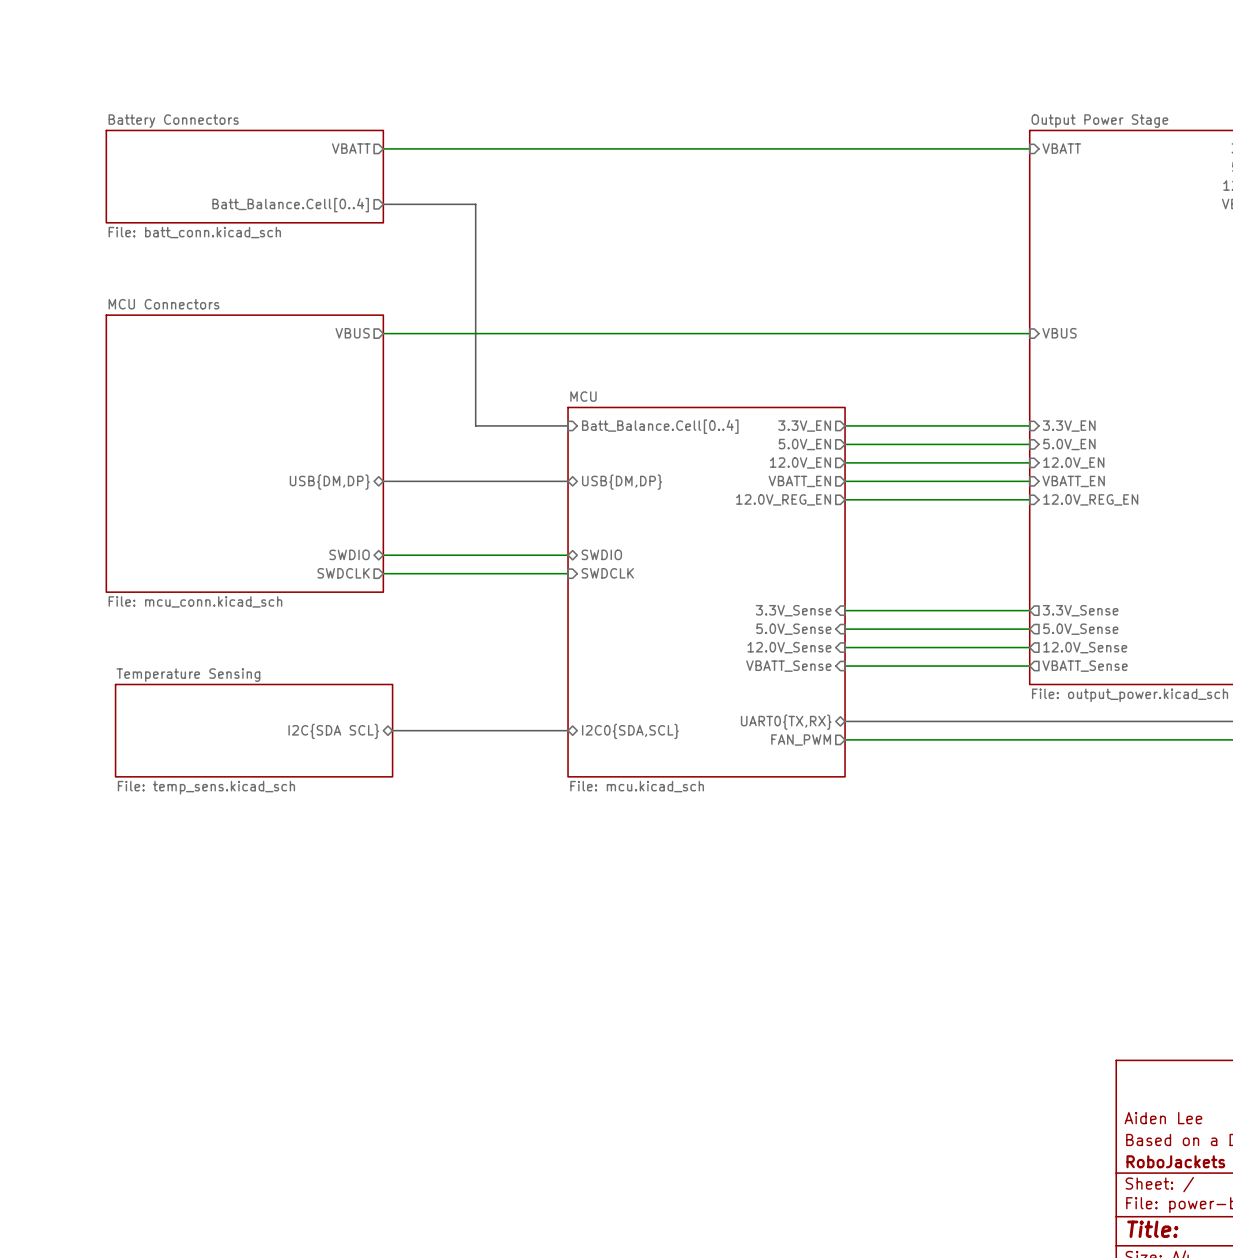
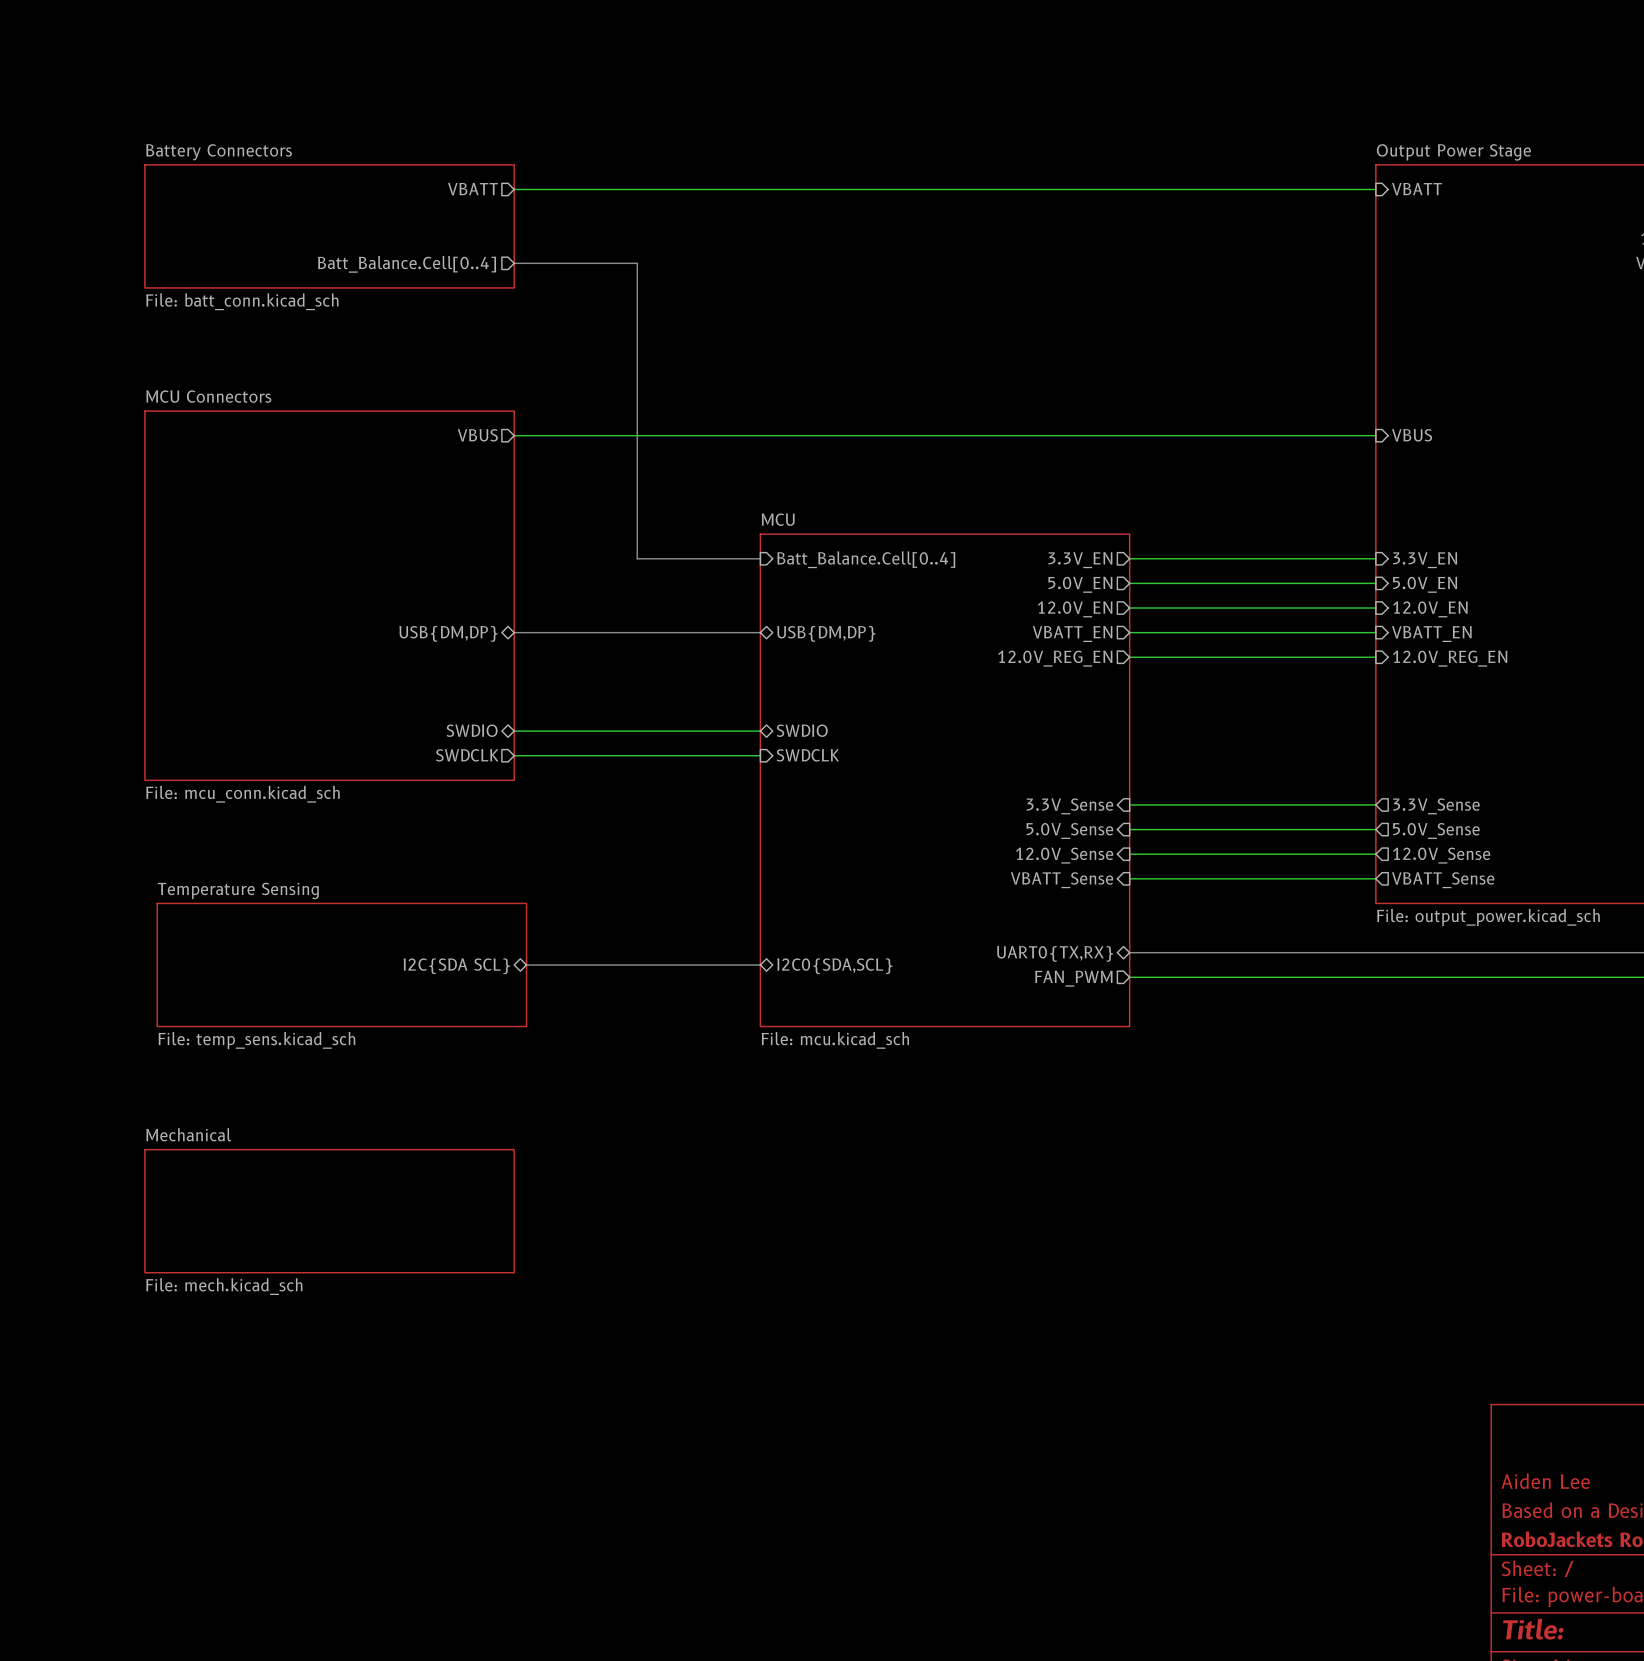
sheet Mechanical: none -> File: mech.kicad_sch (329, 1211)

